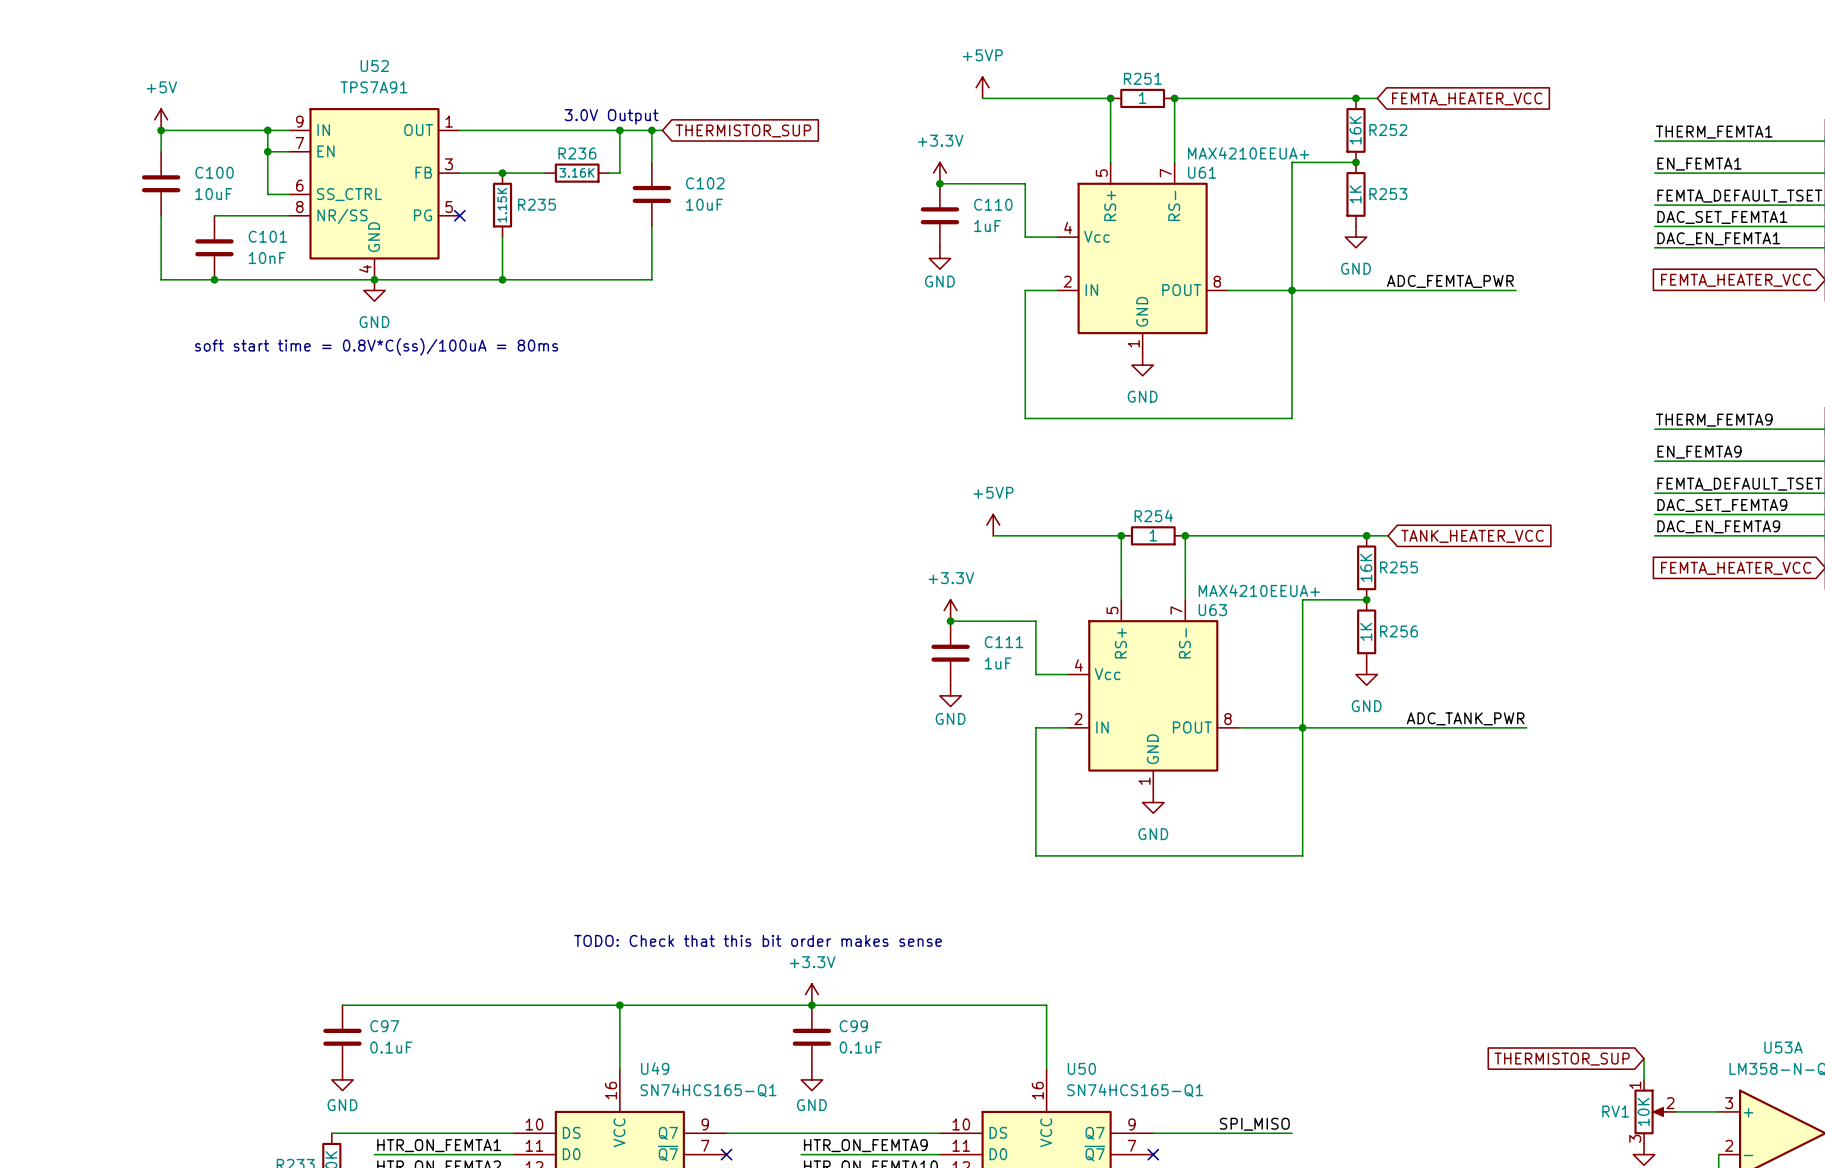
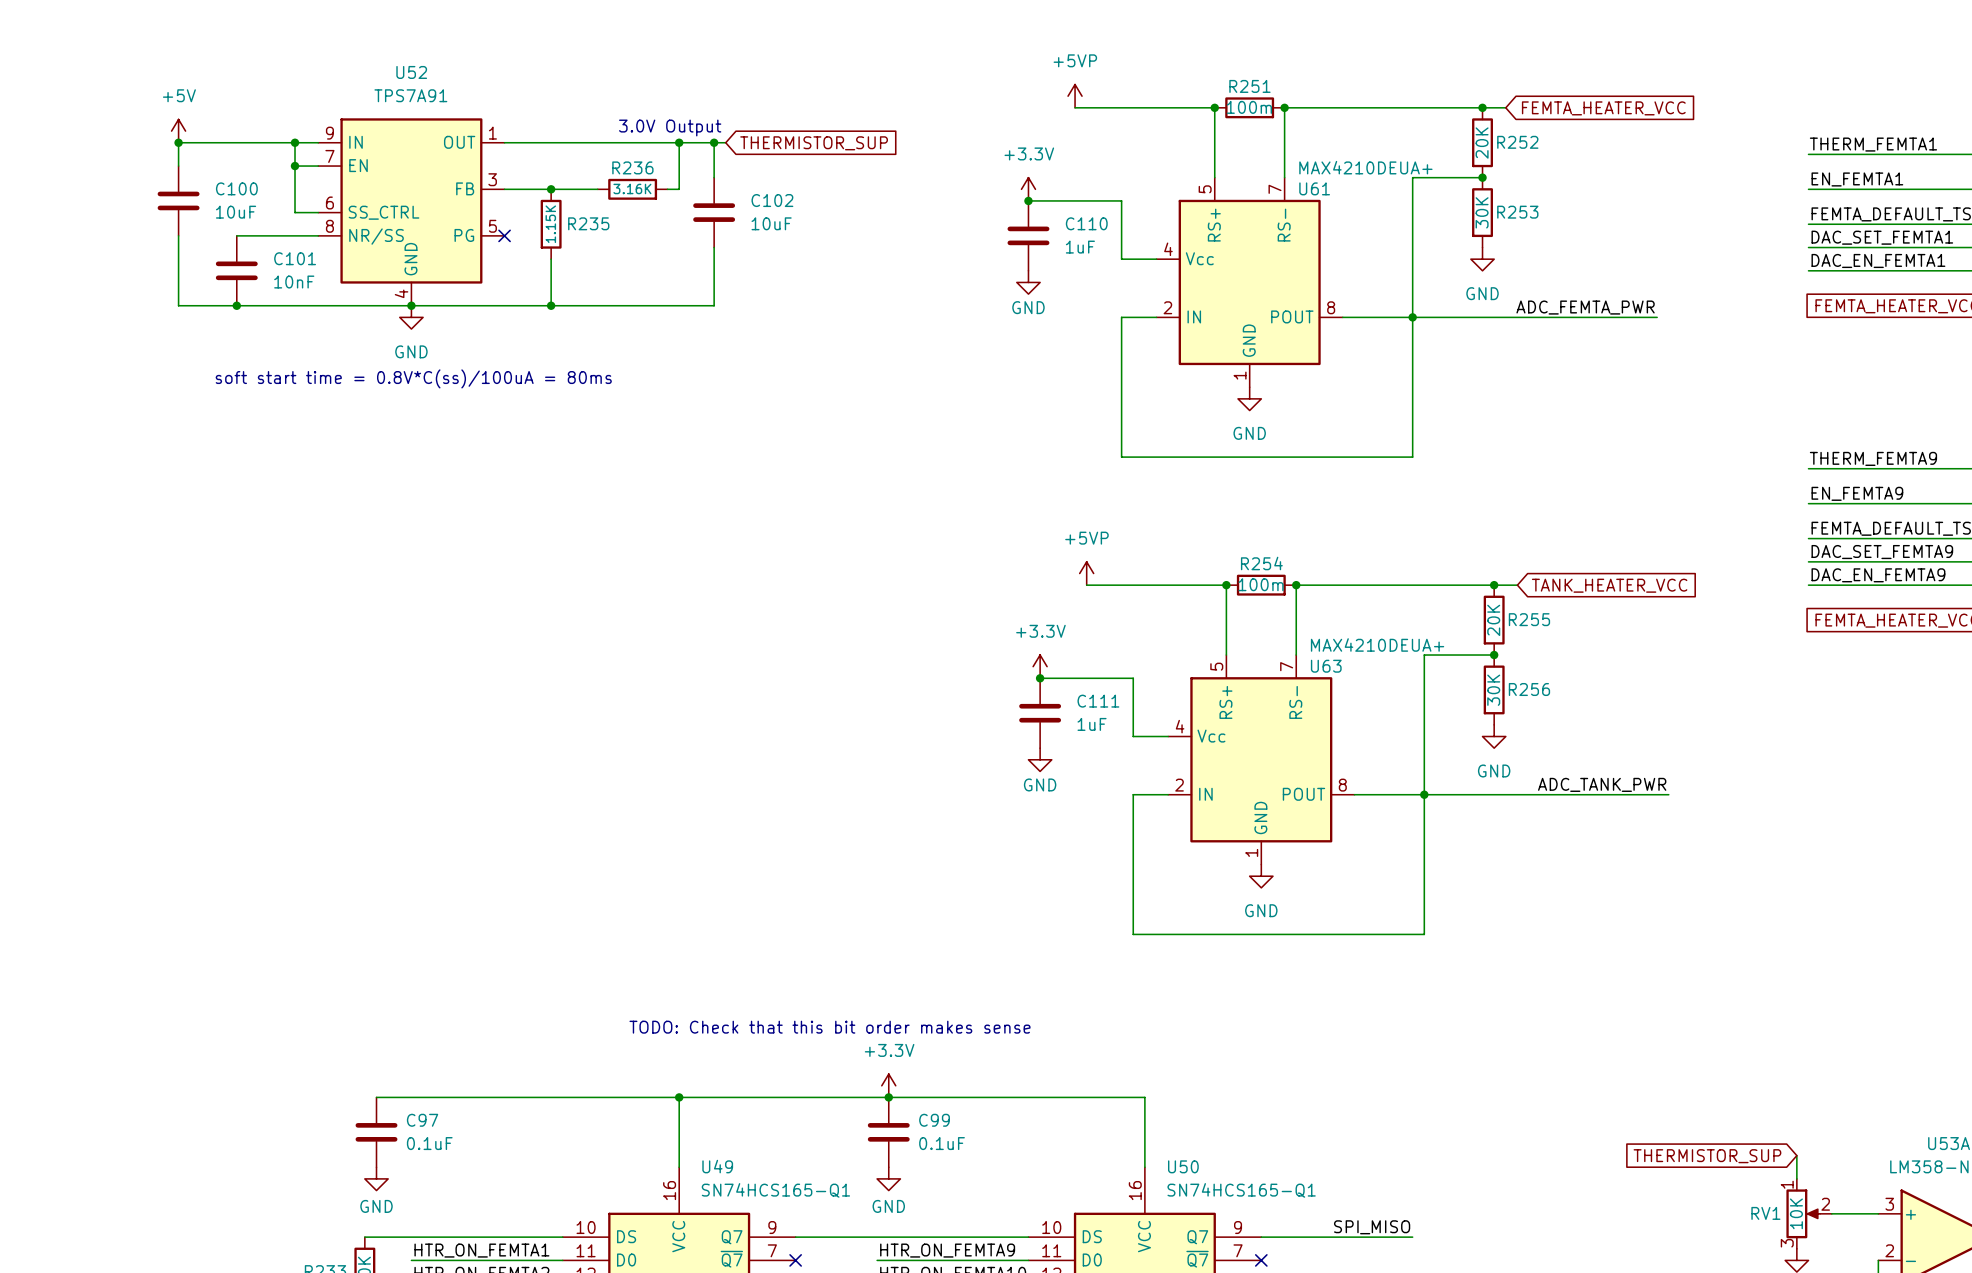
R251 value: 1 (1142, 98) -> 100m (1249, 107)
R252 value: 16K (1355, 130) -> 20K (1482, 143)
U61 value: MAX4210EEUA+ (1248, 153) -> MAX4210DEUA+ (1365, 167)
R253 value: 1K (1355, 194) -> 30K (1482, 212)
R254 value: 1 (1153, 535) -> 100m (1261, 584)
R255 value: 16K (1366, 567) -> 20K (1493, 620)
U63 value: MAX4210EEUA+ (1259, 590) -> MAX4210DEUA+ (1377, 644)
R256 value: 1K (1366, 631) -> 30K (1493, 690)

